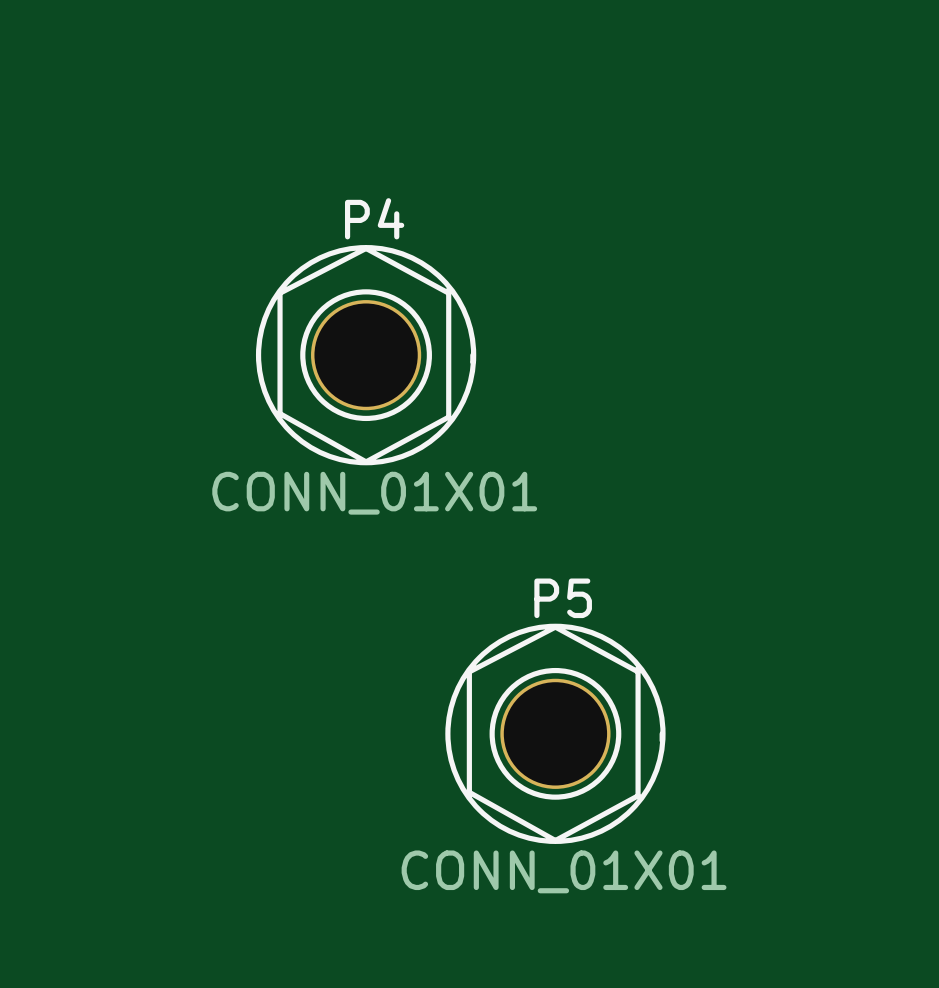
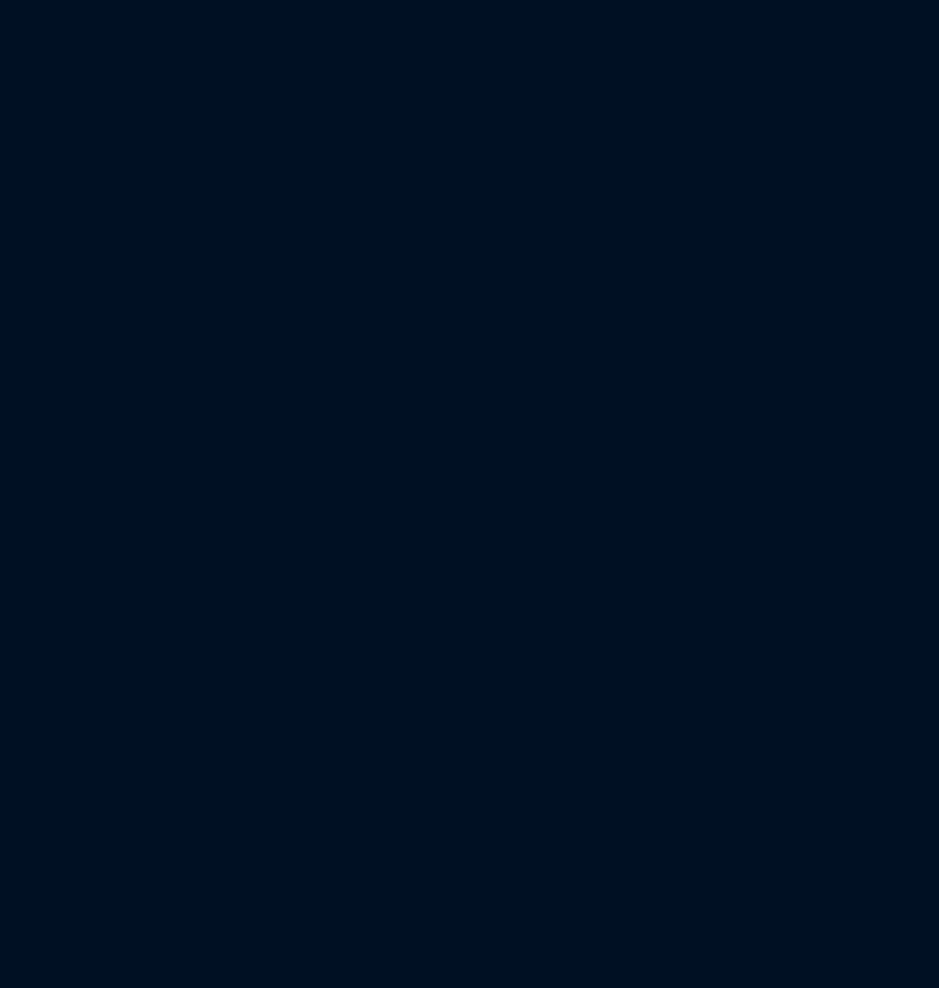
P4: CONN_01X01 (366, 355) -> none
P5: CONN_01X01 (555, 733) -> none

